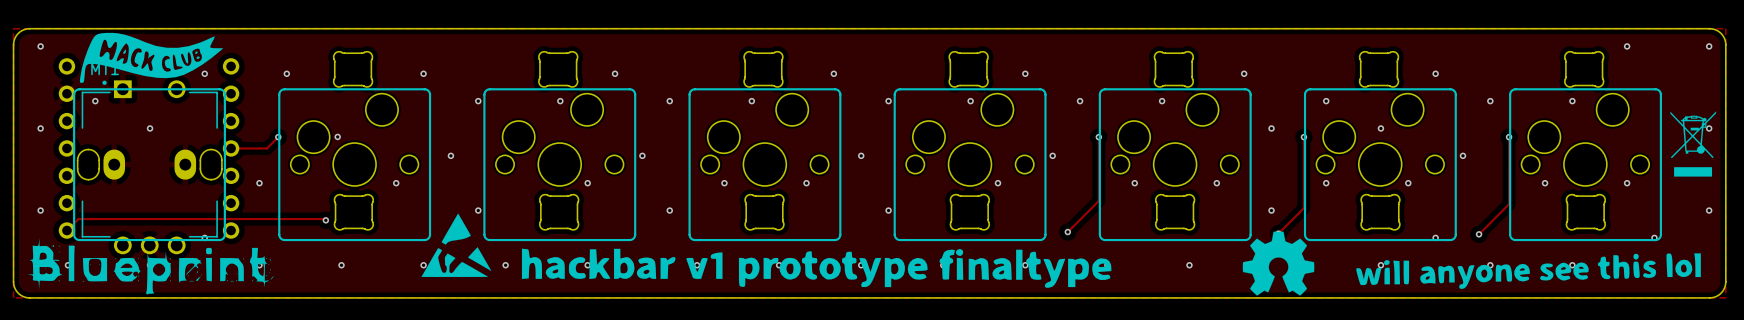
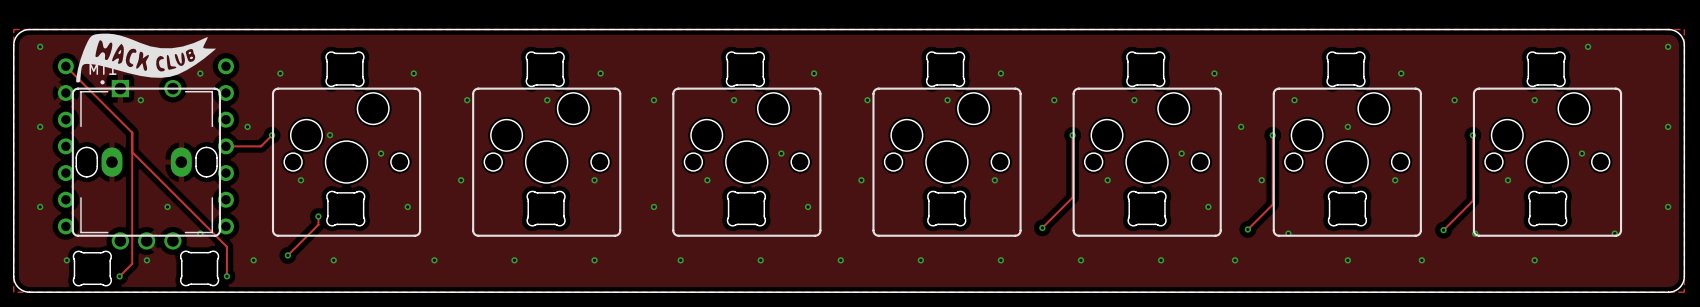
drawing: [27, 32, 1717, 296] -> none
drawing: none -> [76, 33, 217, 83]
track: none -> (65, 66) (132, 132) (132, 263) (119, 276)
via: (95, 101) -> none
via: none -> (140, 100)
via: (150, 128) -> none
via: none -> (247, 126)
track: none -> (132, 152) (226, 246) (226, 276)
via: none -> (381, 153)
via: (450, 155) -> none
via: (642, 155) -> none
via: none -> (781, 153)
via: (861, 155) -> none
via: (1052, 155) -> none
via: none -> (1181, 153)
via: (1462, 155) -> none
via: (259, 183) -> none
via: none -> (300, 180)
via: (396, 183) -> none
via: none -> (461, 180)
via position: (587, 183) -> (594, 180)
via: (806, 183) -> none
via: none -> (861, 180)
via position: (997, 183) -> (994, 180)
via: (1216, 183) -> none
via: none -> (1261, 180)
via: (1326, 183) -> none
via position: (1408, 183) -> (1395, 180)
via position: (1627, 183) -> (1581, 153)
via: none -> (167, 206)
via: none -> (407, 206)
via: (478, 210) -> none
via: none -> (808, 206)
via: (888, 210) -> none
via: none -> (1208, 206)
via: (1271, 210) -> none
track: (325, 220) (78, 219) (66, 230) -> (318, 216) (318, 224) (287, 255)
via: none -> (1288, 233)
via: (1435, 237) -> none
via: none -> (1475, 233)
via: none -> (287, 255)
via position: (423, 265) -> (434, 260)
via position: (505, 265) -> (514, 260)
via position: (587, 265) -> (594, 260)
via: none -> (1235, 260)
via: none -> (1421, 260)
via: (1490, 265) -> none
part: none -> (92, 268)
part: none -> (199, 268)
via: none -> (119, 276)
via: none -> (226, 276)

